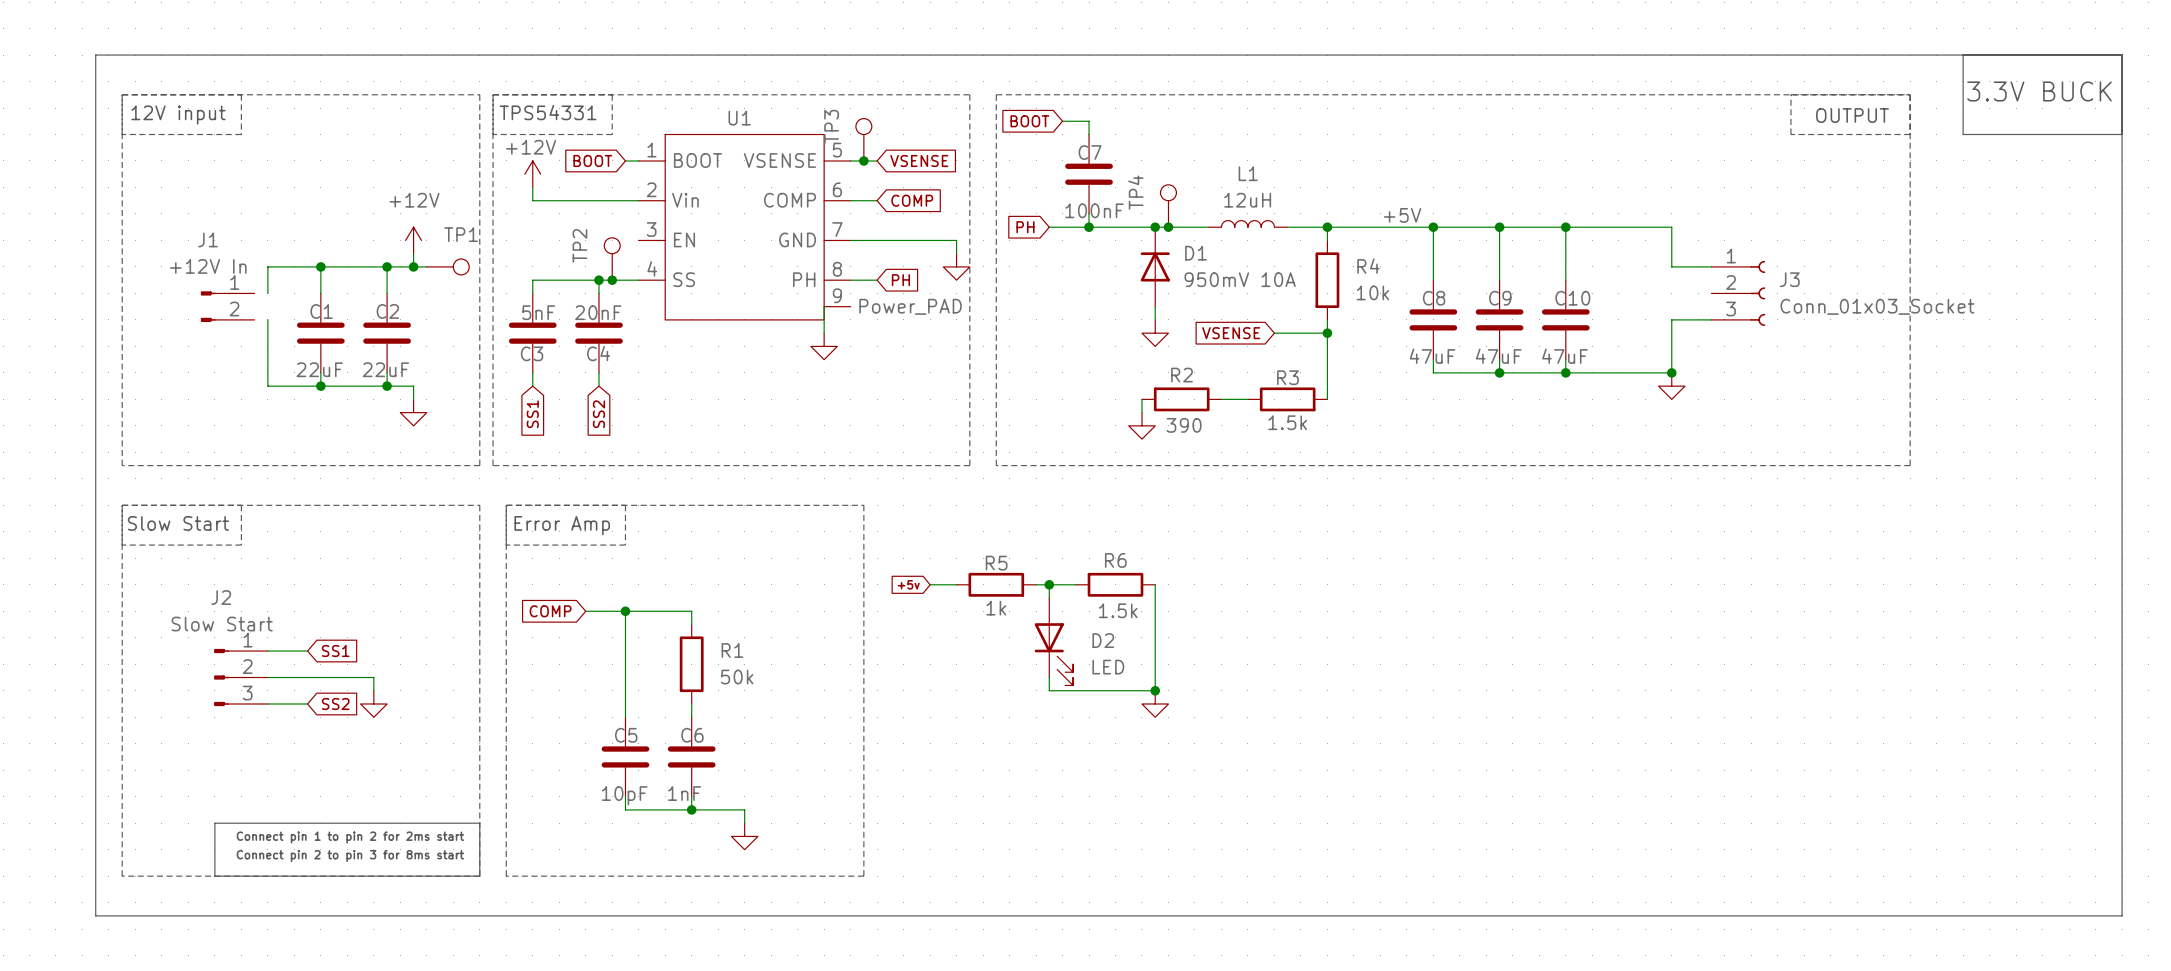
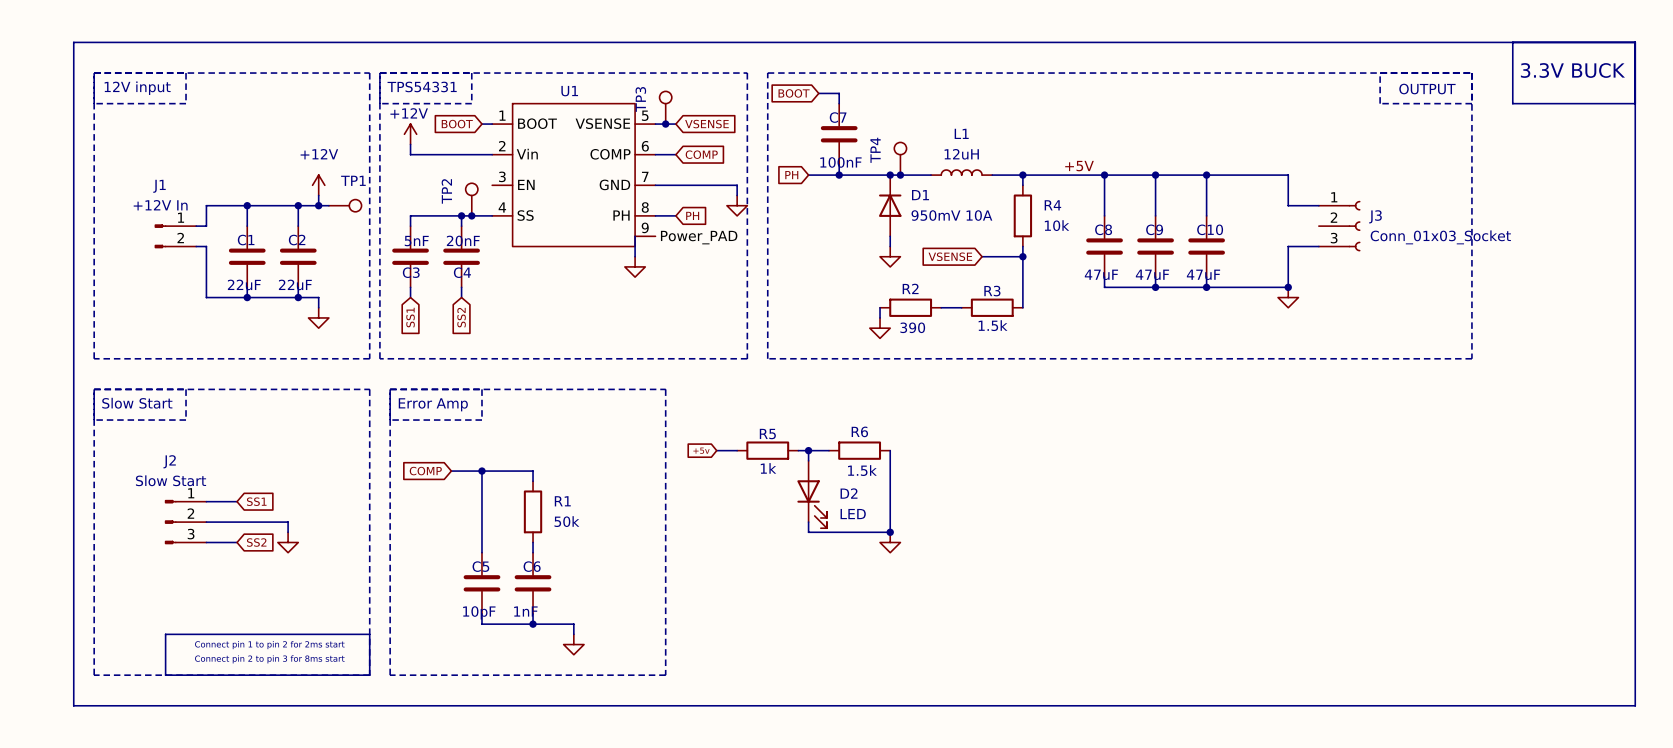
wire: none -> (196, 226) (206, 226)
wire: none -> (196, 246) (206, 246)

